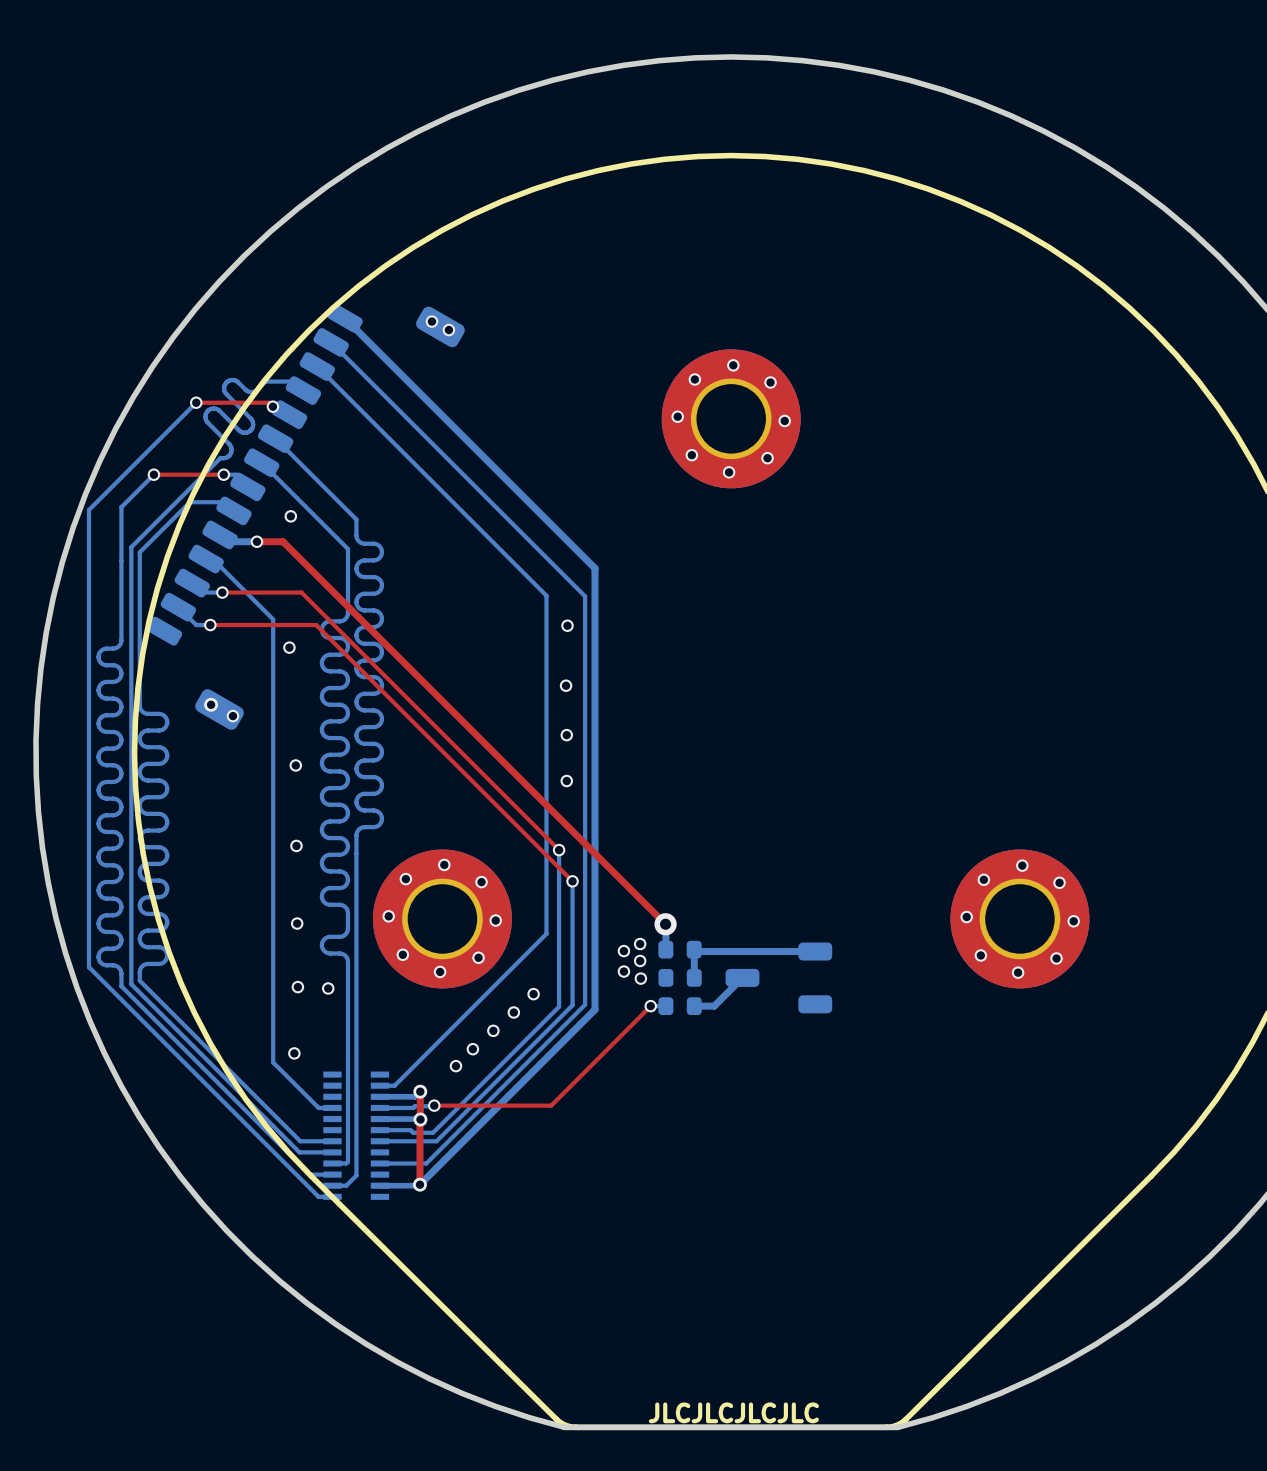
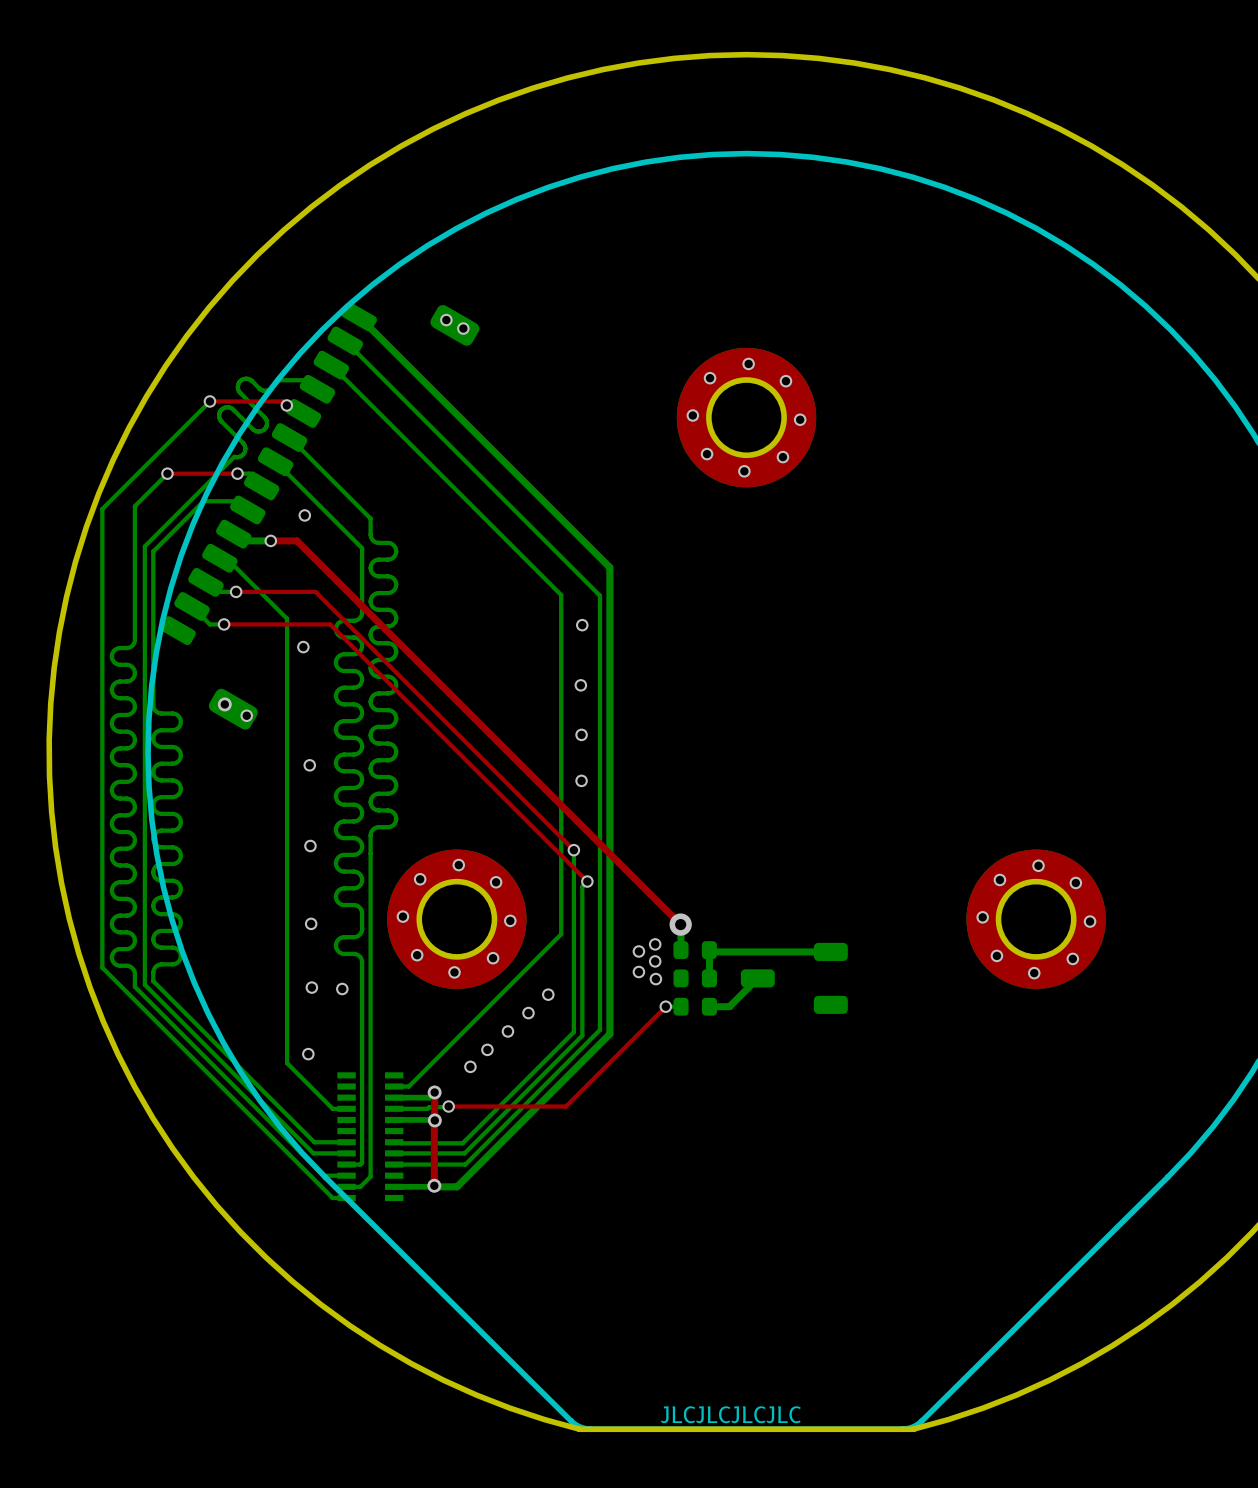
bottom track: (572, 881) (572, 1005) (436, 1141) (385, 1141) -> (587, 881) (582, 886) (582, 1035) (464, 1153) (394, 1153)
bottom track: (585, 1004) (426, 1163) -> (599, 1005) (599, 1029) (465, 1164) (440, 1164)
bottom track: (559, 1006) (433, 1132) (413, 1132) (410, 1130) (379, 1130) -> (573, 1007) (573, 1032) (462, 1143) (399, 1142)
bottom track: (595, 1009) (418, 1185) -> (609, 1010) (609, 1034) (457, 1186) (433, 1186)

